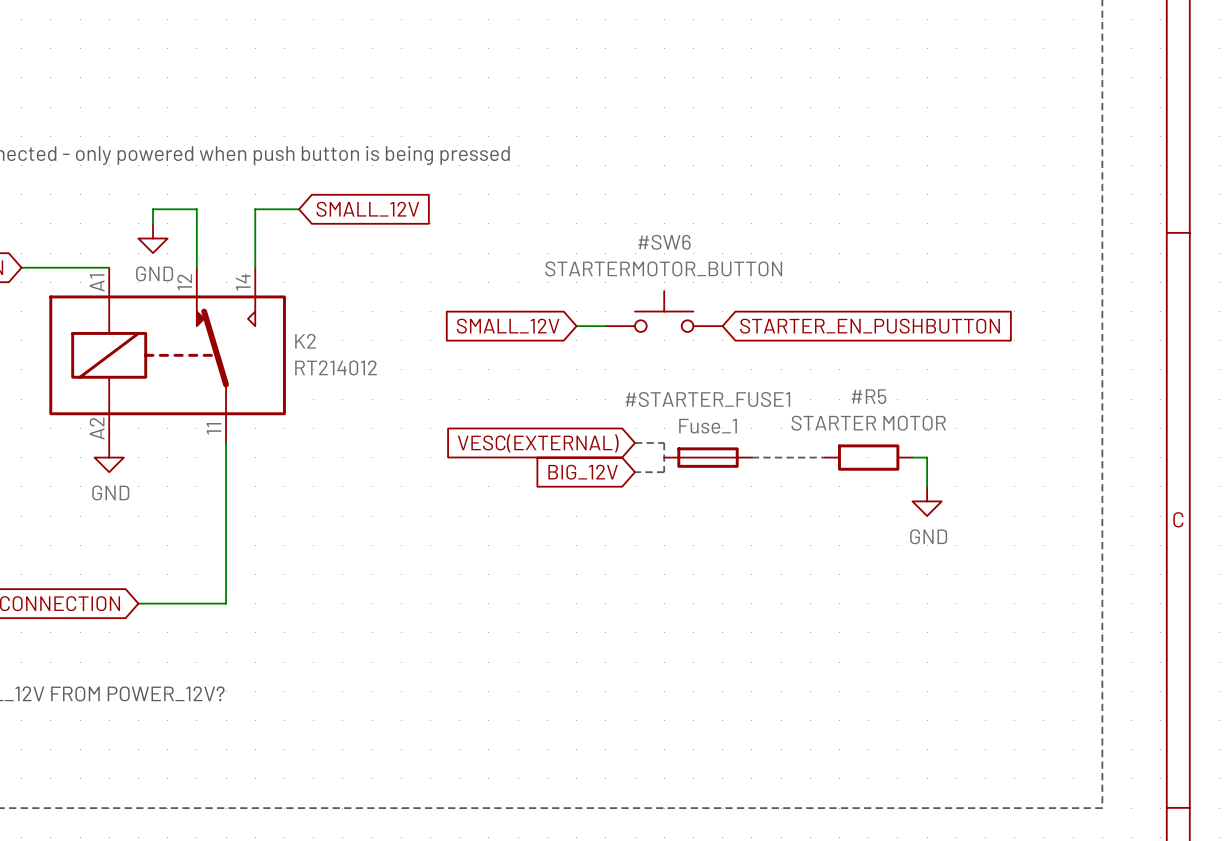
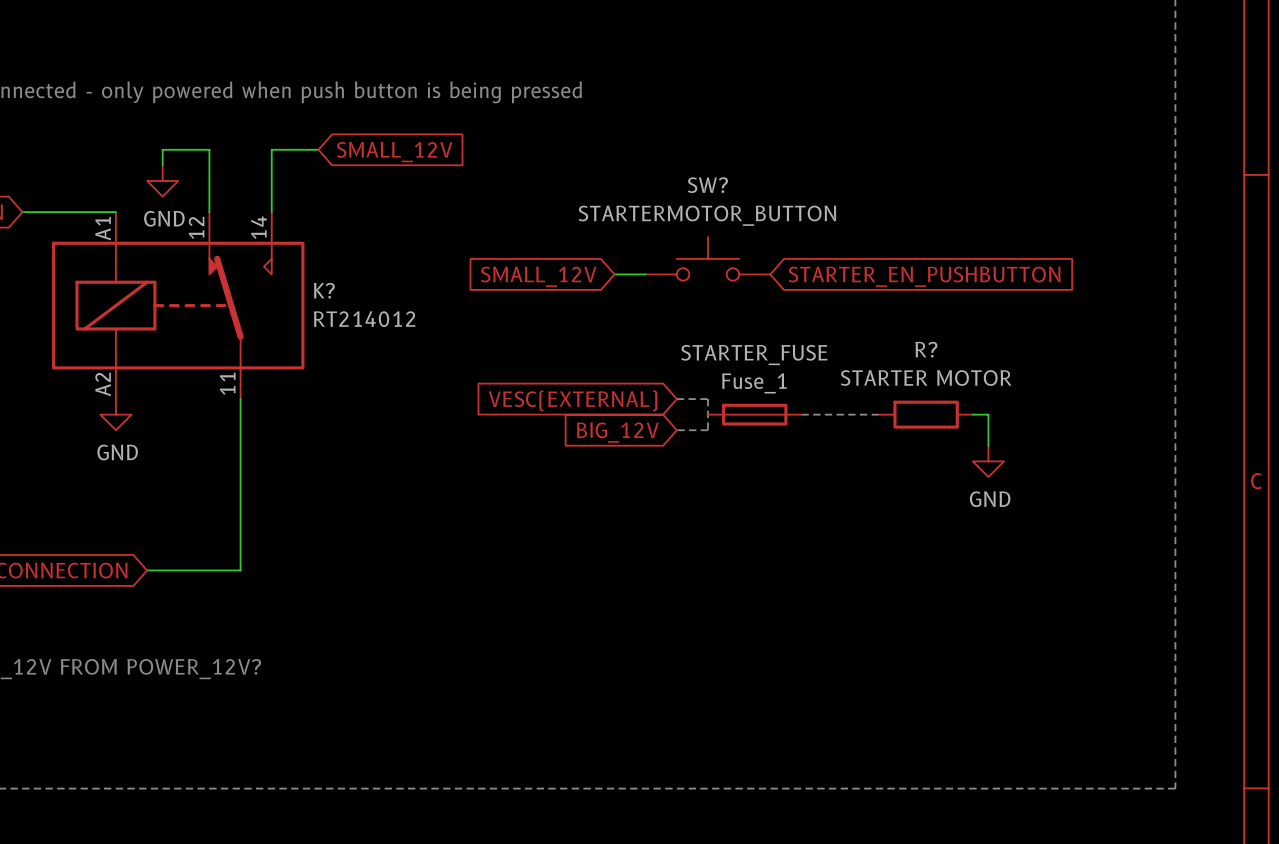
SW?: none -> STARTERMOTOR_BUTTON (707, 258)
#SW6: STARTERMOTOR_BUTTON (664, 311) -> none
K2 name: K2 (305, 341) -> K? (324, 290)
STARTER_FUSE: none -> Fuse_1 (754, 414)
#STARTER_FUSE1: Fuse_1 (708, 457) -> none
R?: none -> STARTER MOTOR (926, 414)
#R5: STARTER MOTOR (868, 457) -> none

